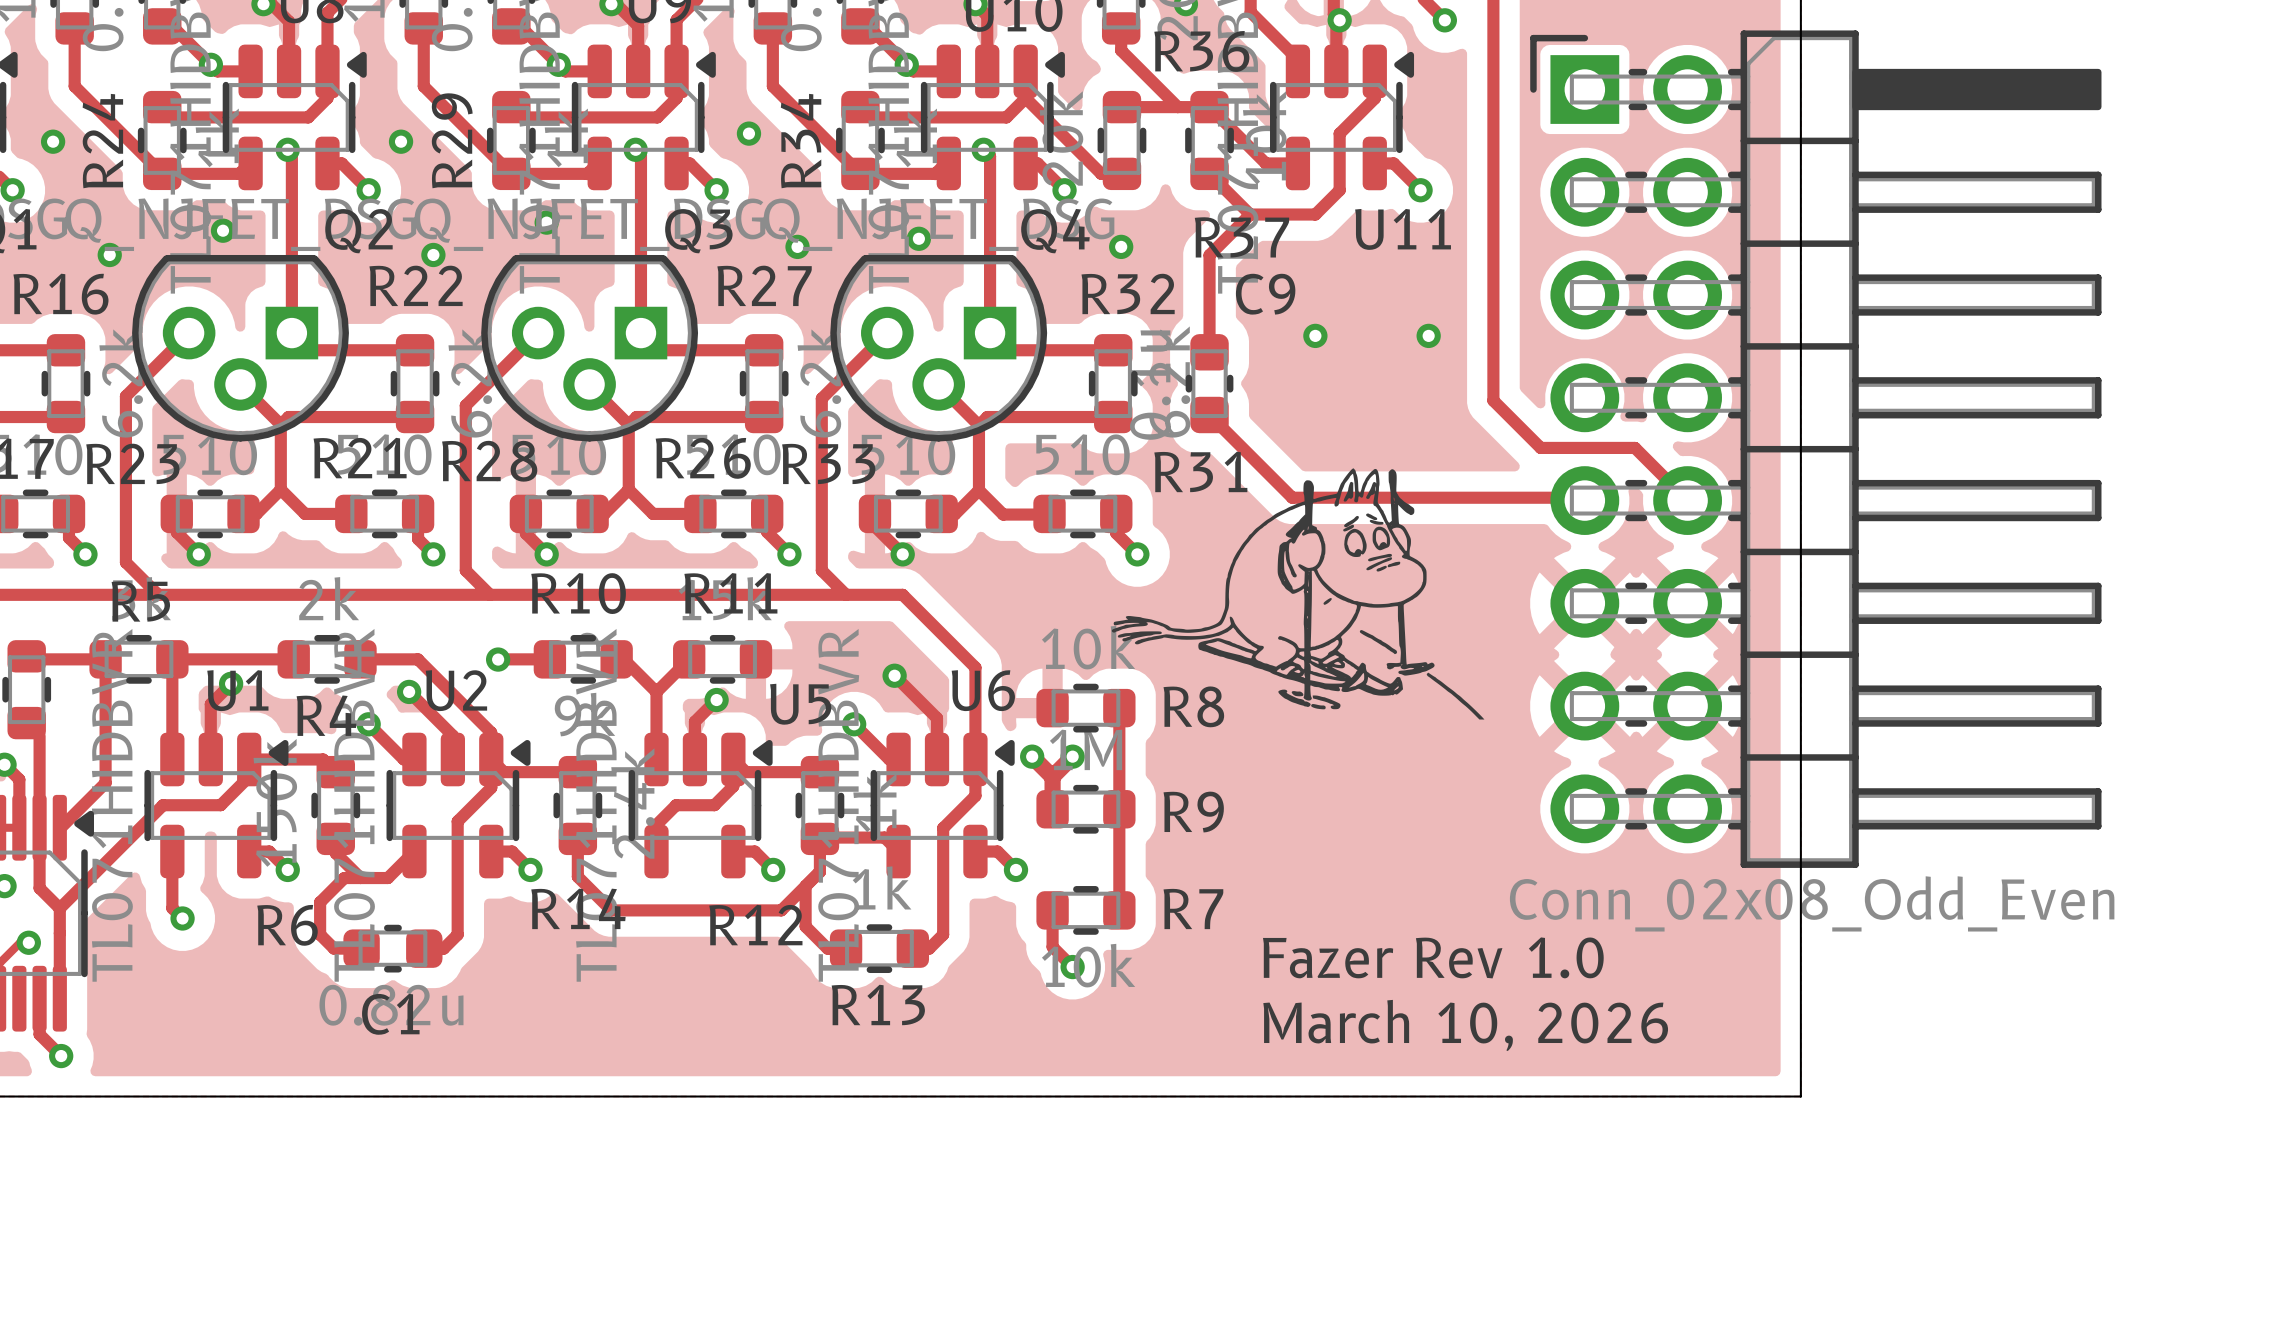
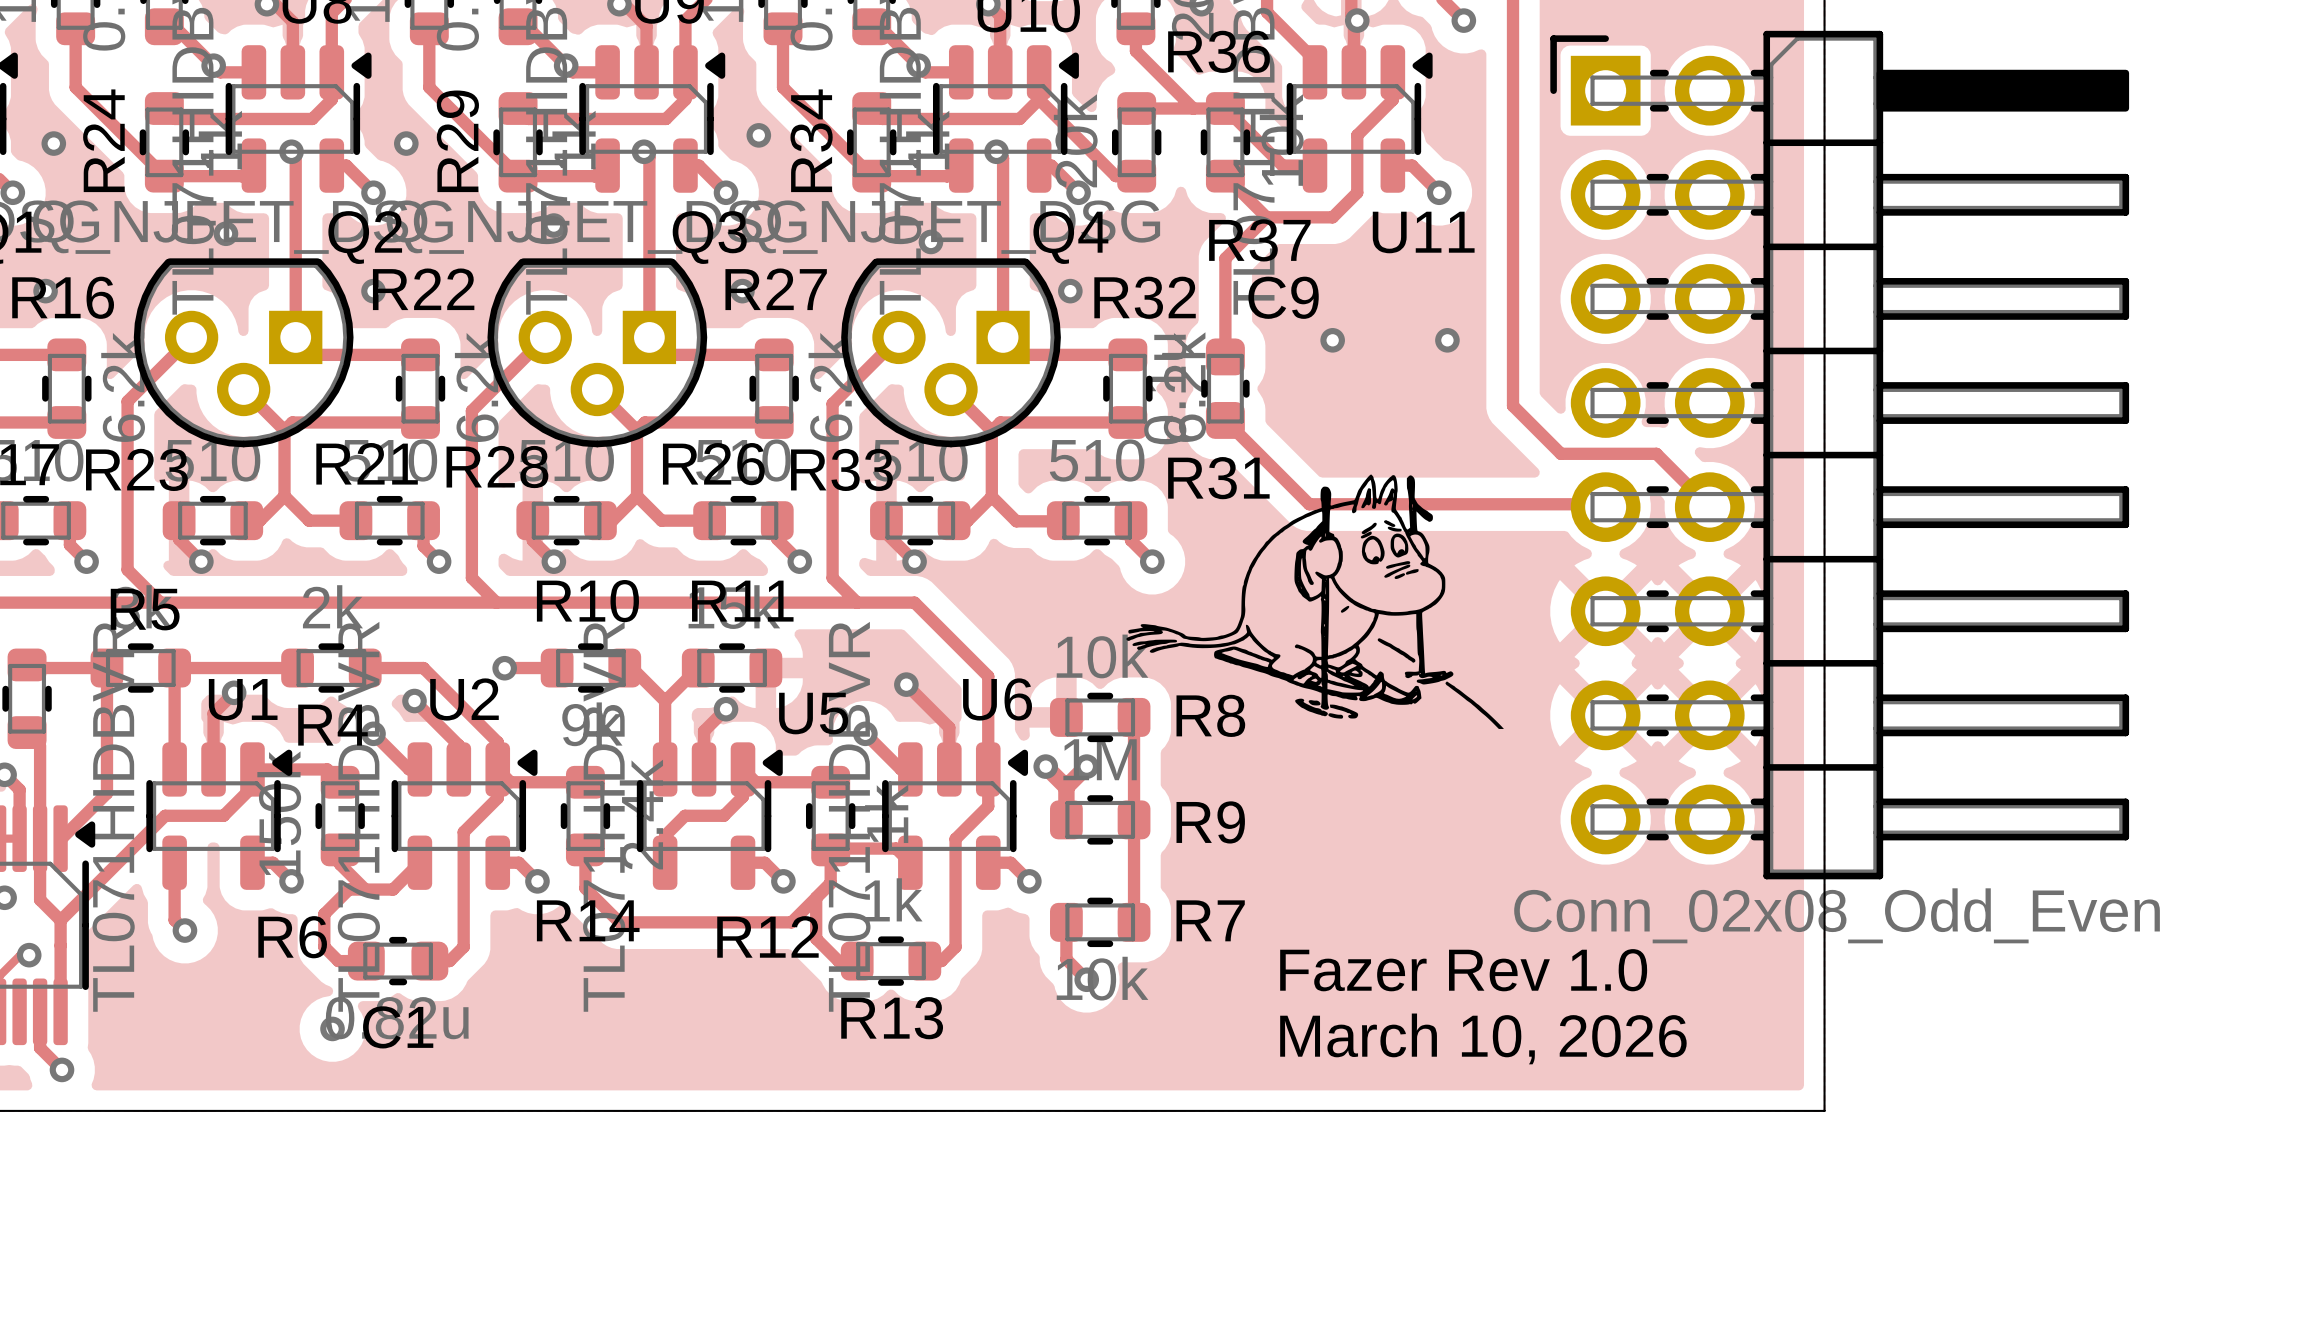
via position: (797, 246) -> (742, 291)
via position: (1121, 246) -> (1070, 291)
via position: (109, 254) -> (45, 291)
via position: (433, 254) -> (373, 291)
via: none -> (332, 1028)

